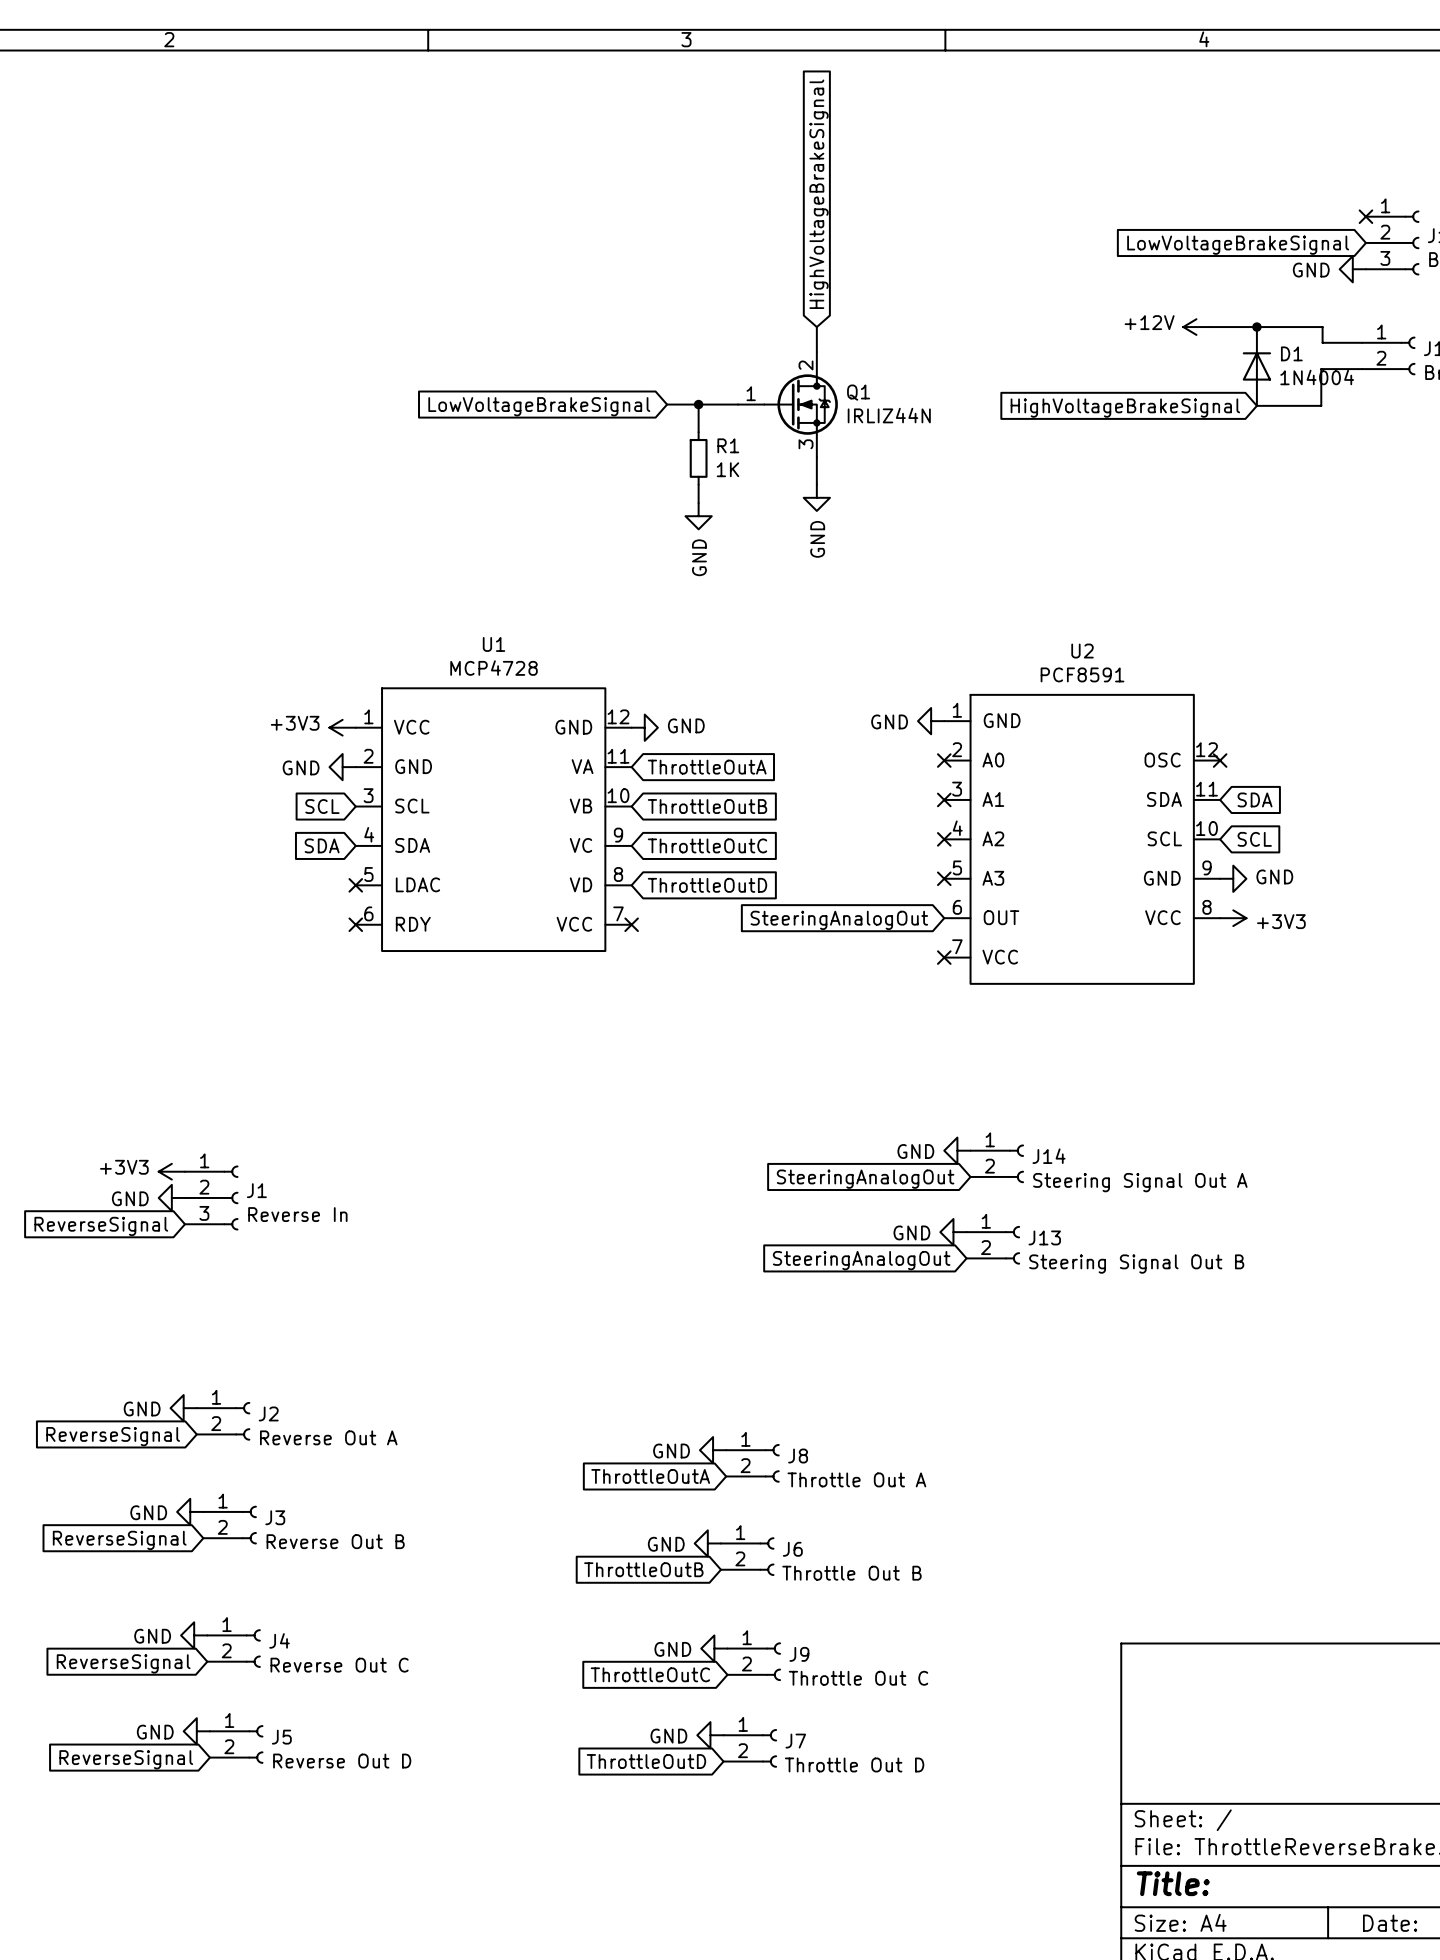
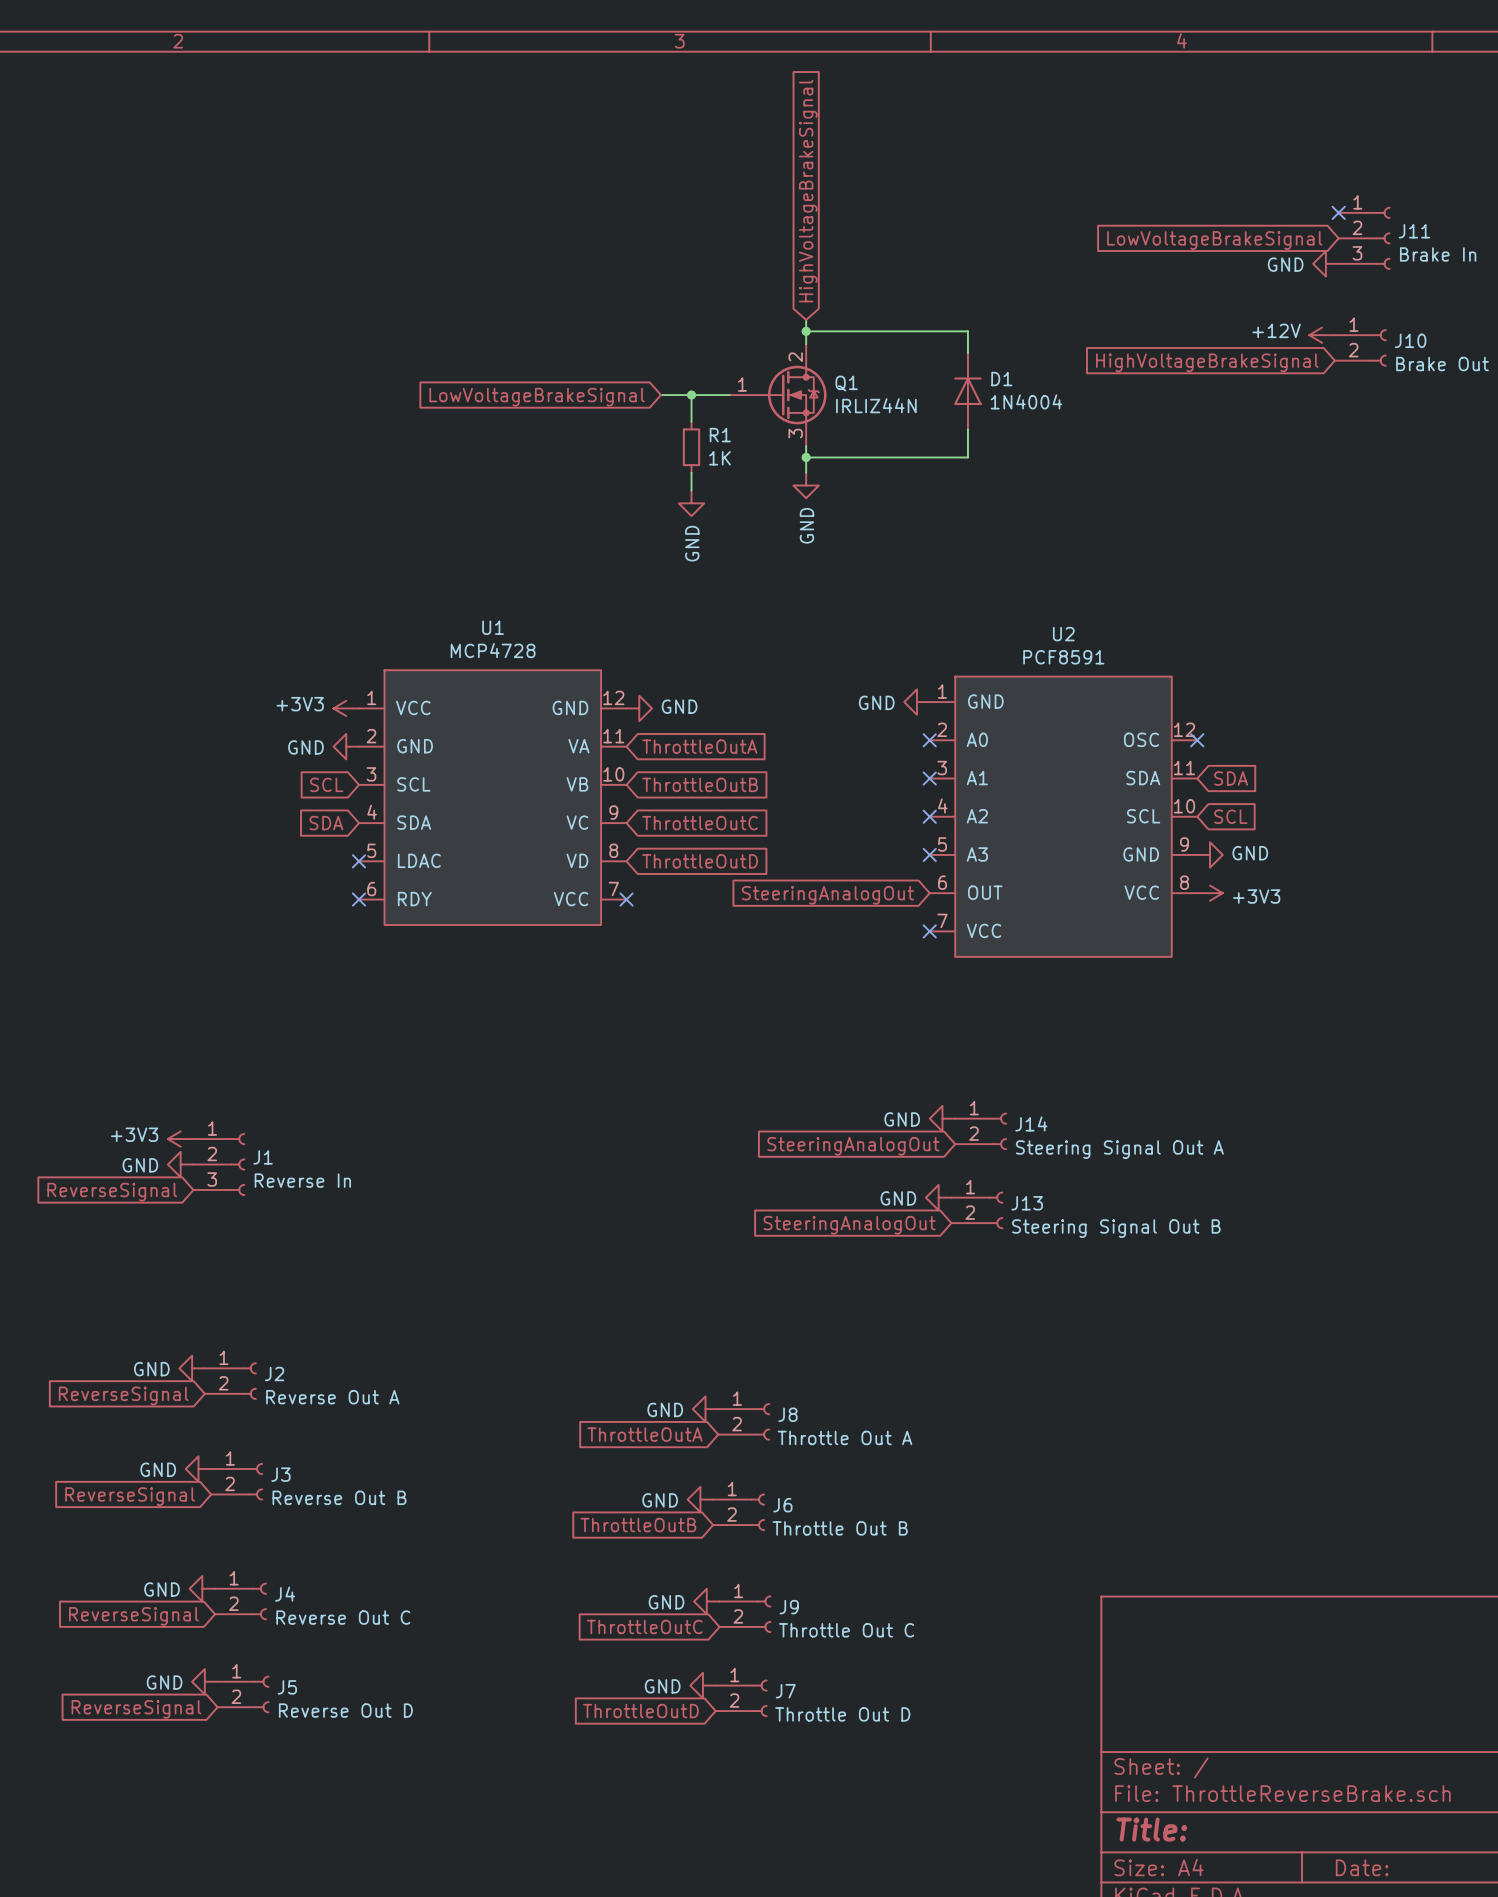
power symbol position: +12V (1196, 327) -> +12V (1322, 335)
wire: (1209, 327) (1322, 327) (1322, 342) (1362, 342) -> none
junction: (1256, 327) -> none
wire: none -> (806, 331) (967, 331) (967, 353)
junction: none -> (806, 331)
D1 position: (1256, 366) -> (967, 391)
wire: (1362, 369) (1321, 369) (1321, 405) (1256, 405) -> none
global label position: HighVoltageBrakeSignal (1125, 408) -> HighVoltageBrakeSignal (1207, 362)
wire: none -> (967, 429) (967, 457) (806, 457)
junction: none -> (806, 457)

